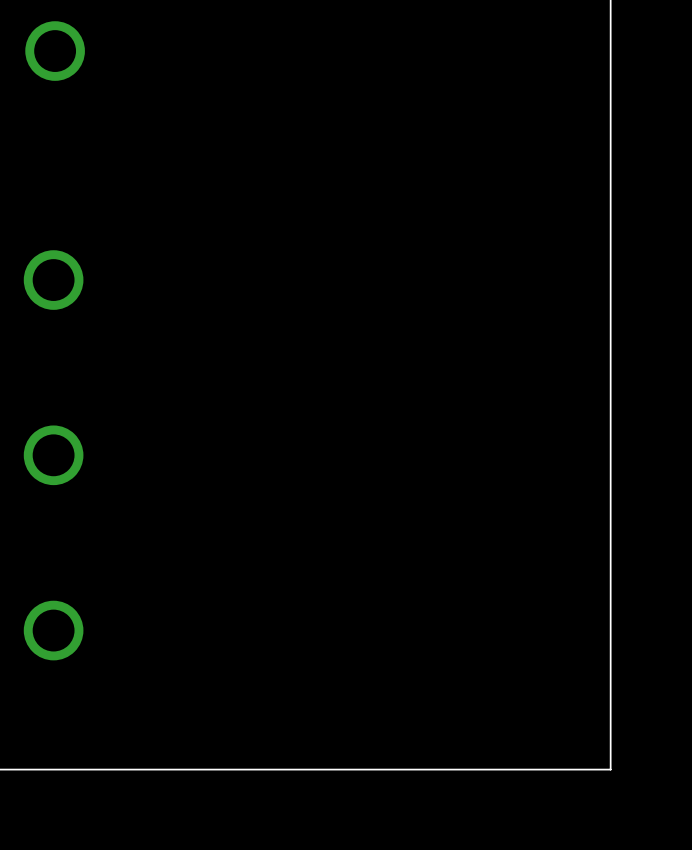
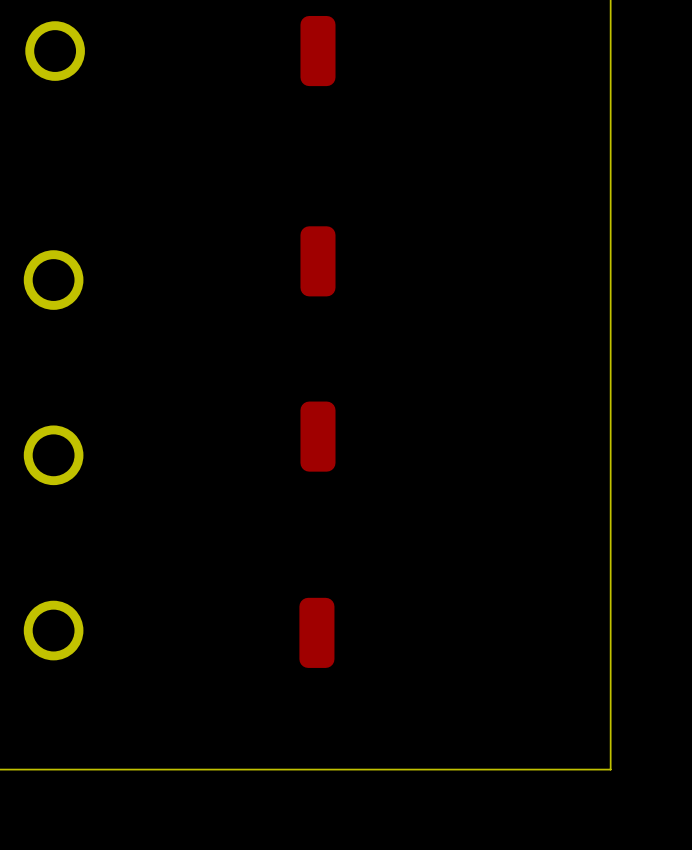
part: none -> (317, 51)
part: none -> (317, 261)
part: none -> (317, 436)
part: none -> (316, 632)

